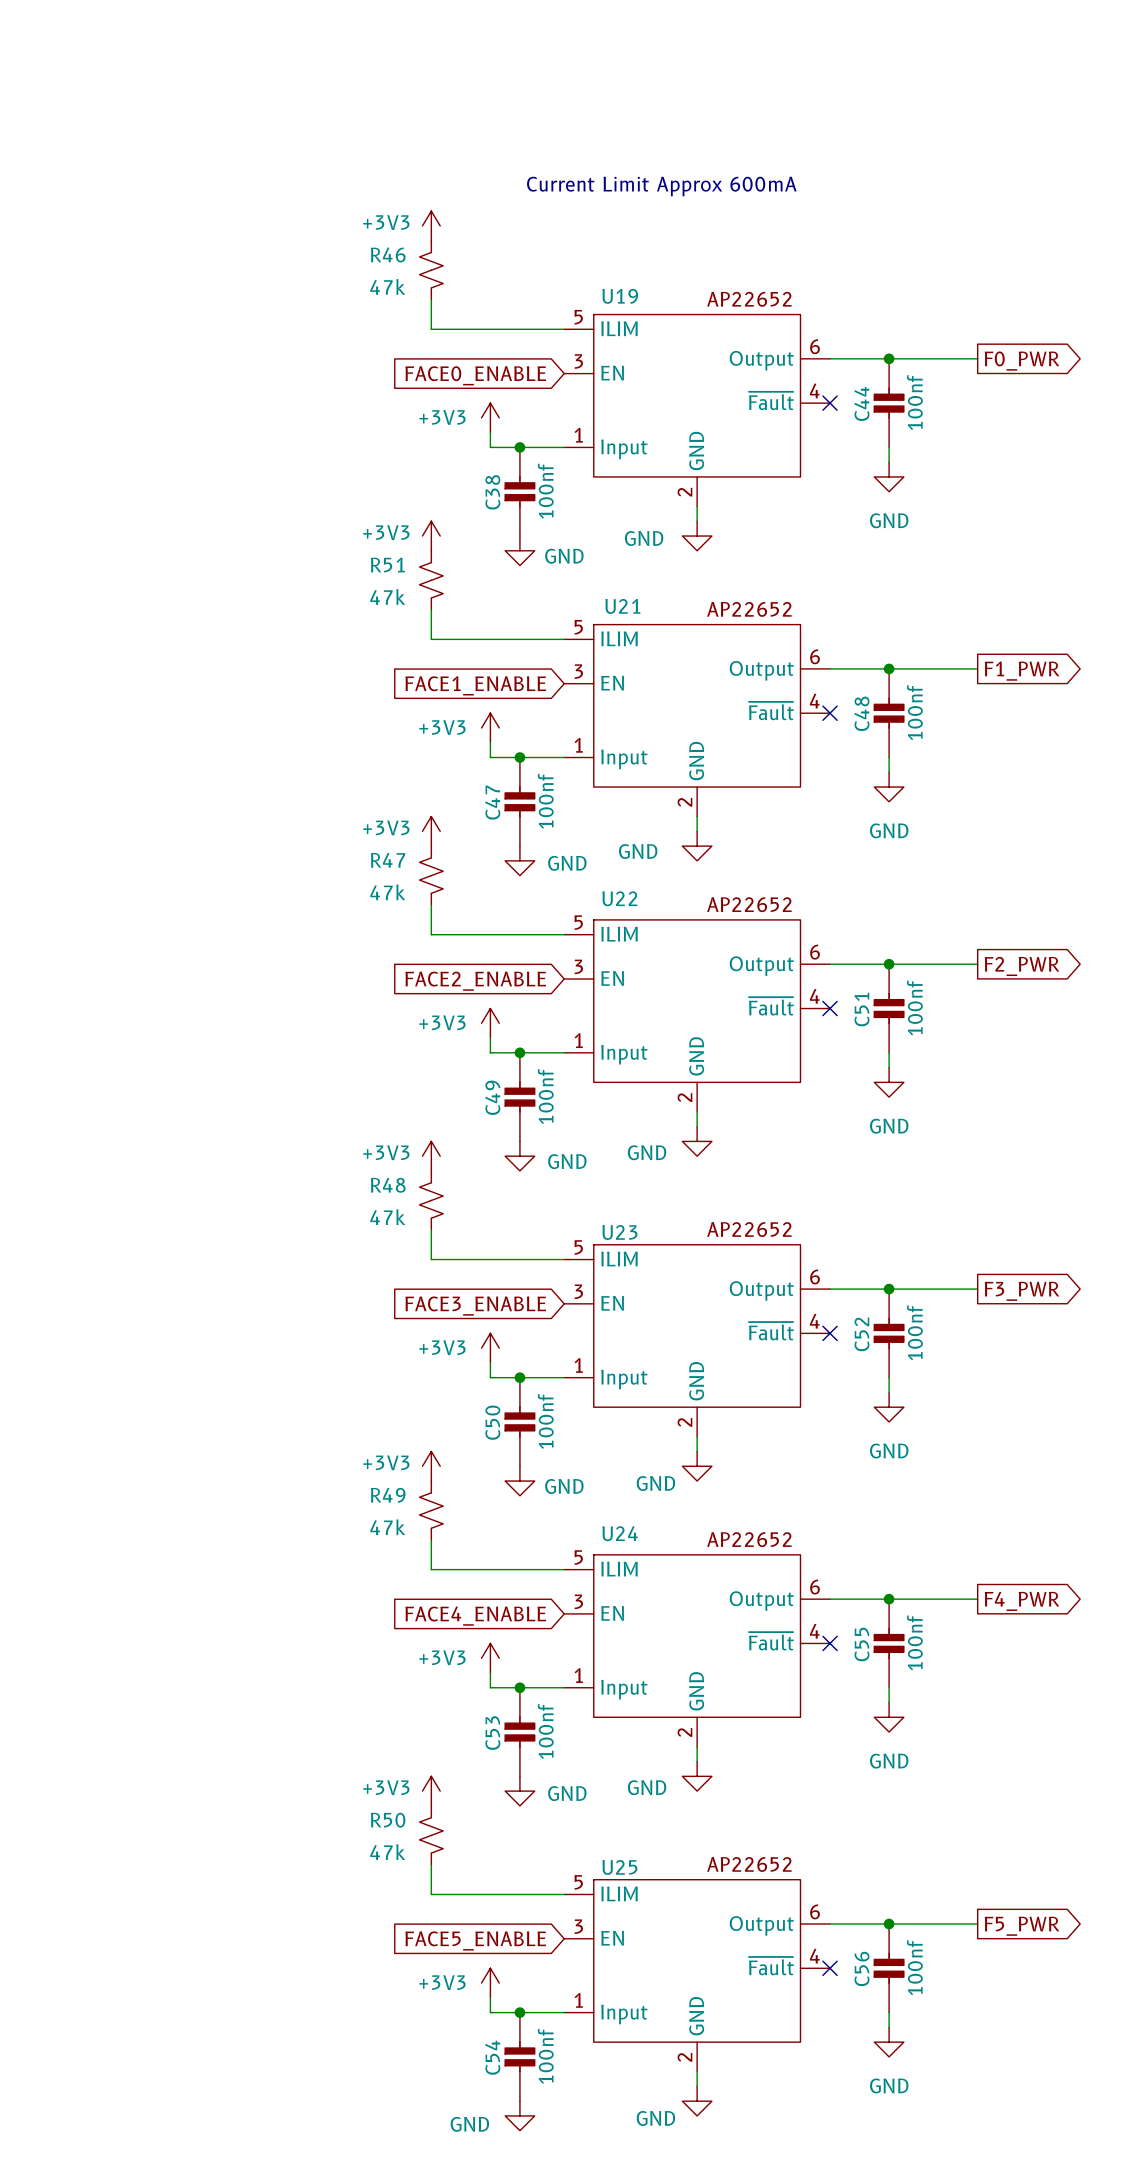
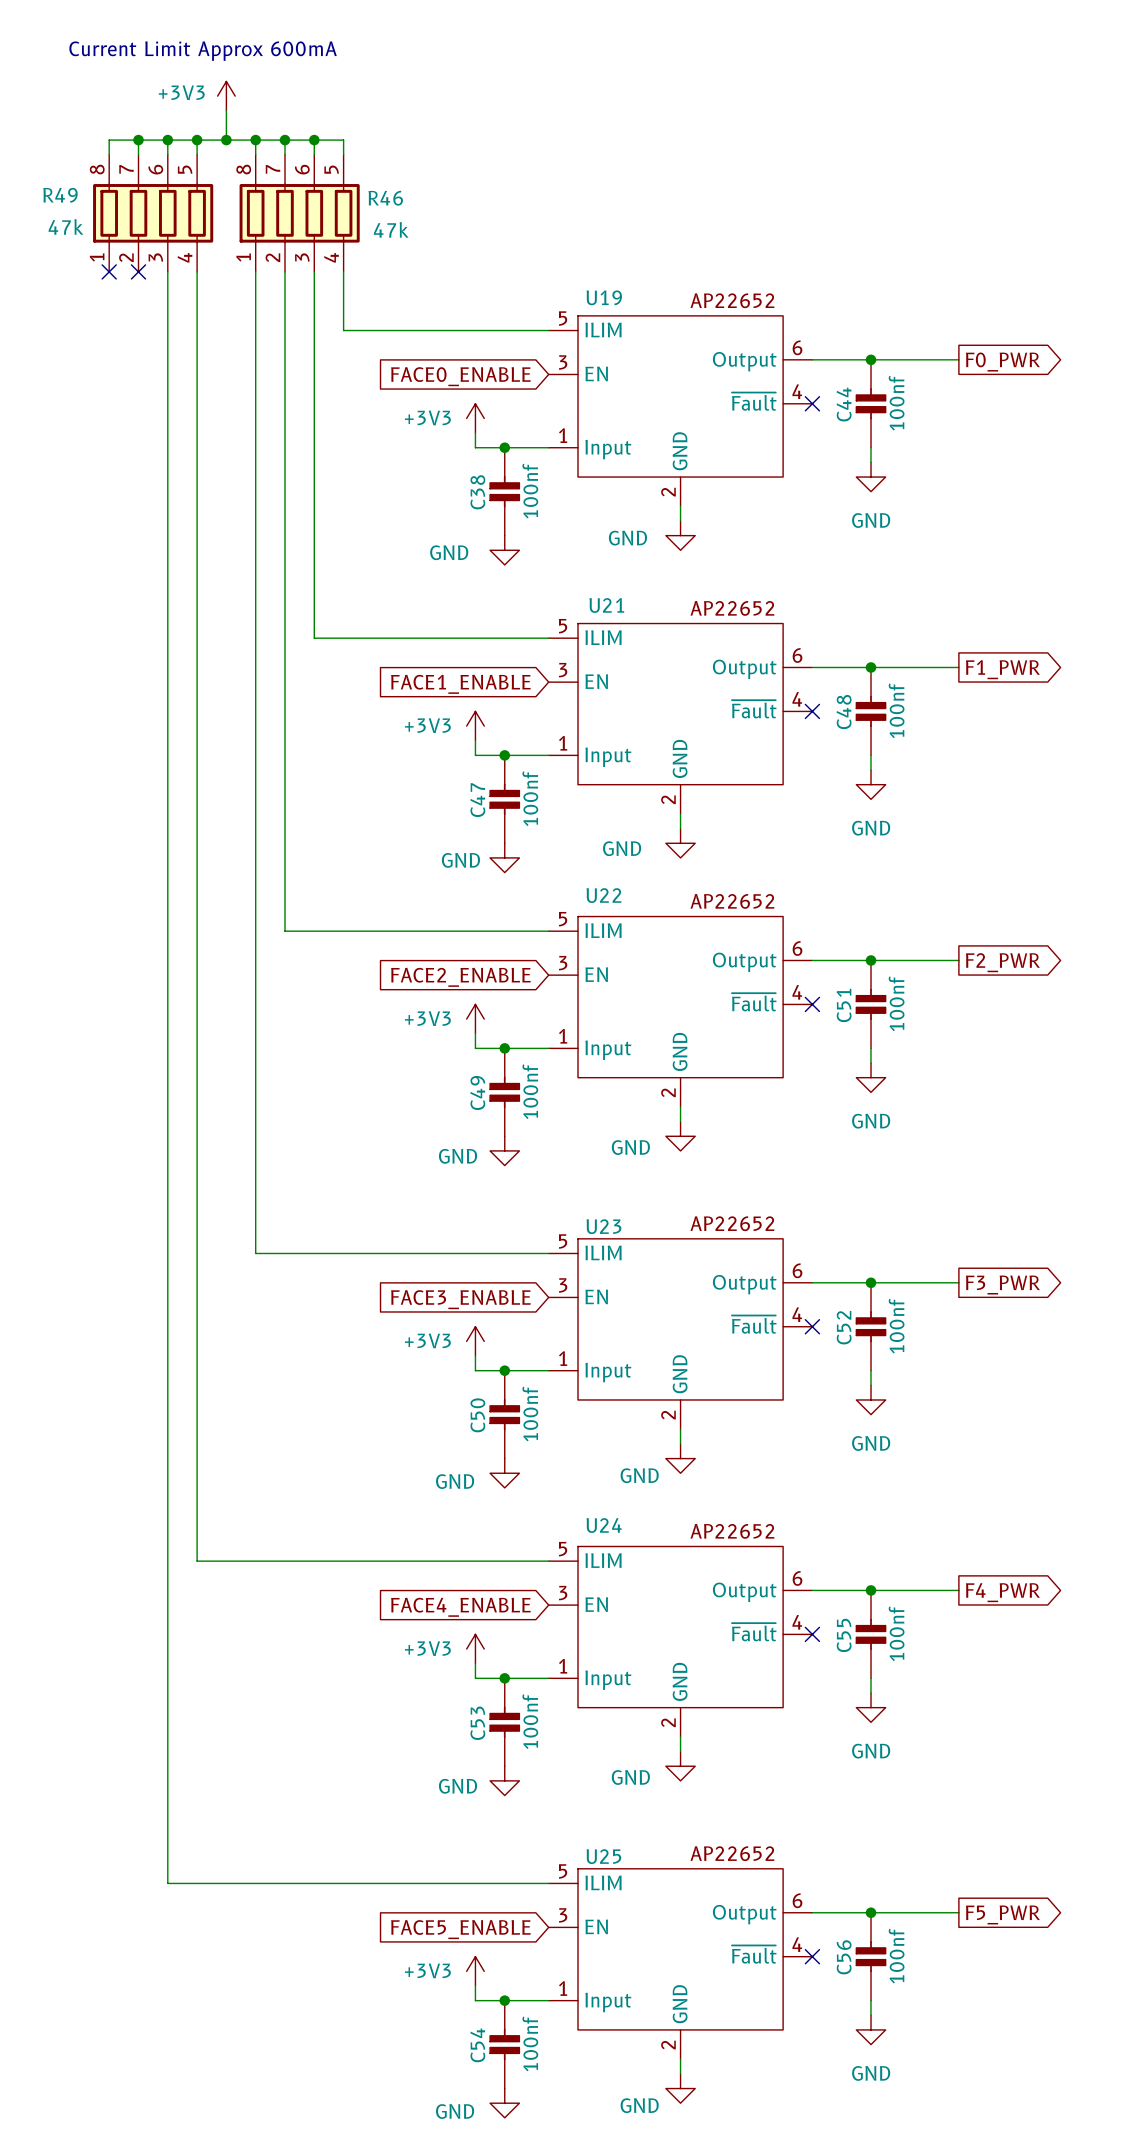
text: none -> Current Limit Approx 600mA (203, 51)
wire: none -> (226, 110) (226, 140)
wire: none -> (138, 140) (138, 154)
junction: none -> (138, 140)
wire: none -> (167, 140) (167, 154)
junction: none -> (167, 140)
wire: none -> (197, 140) (197, 154)
junction: none -> (197, 140)
junction: none -> (226, 140)
wire: none -> (255, 140) (255, 154)
junction: none -> (255, 140)
wire: none -> (284, 140) (284, 154)
junction: none -> (284, 140)
wire: none -> (314, 140) (314, 154)
junction: none -> (314, 140)
wire: none -> (109, 154) (109, 140) (343, 140) (343, 154)
text: Current Limit Approx 600mA (661, 186) -> none
power symbol position: +3V3 (431, 225) -> +3V3 (226, 96)
R46 symbol: [419, 240, 444, 300] -> [239, 154, 360, 272]
R46 name position: R46 (388, 255) -> R46 (385, 198)
no-connect mark: none -> (109, 271)
no-connect mark: none -> (138, 271)
R46 value position: 47k (387, 286) -> 47k (391, 229)
wire: (431, 299) (431, 329) -> (343, 271) (343, 330) (416, 330)
power symbol: +3V3 (431, 536) -> none
power symbol text position: GND (564, 556) -> GND (449, 552)
R51: 47k (431, 580) -> none
wire: (431, 609) (431, 639) -> (314, 271) (314, 638) (416, 638)
power symbol: +3V3 (431, 831) -> none
power symbol text position: GND (567, 863) -> GND (460, 860)
R47: 47k (431, 875) -> none
wire: (431, 905) (431, 934) -> (284, 271) (284, 931) (416, 931)
power symbol: +3V3 (431, 1156) -> none
power symbol text position: GND (567, 1161) -> GND (458, 1156)
R48: 47k (431, 1200) -> none
wire: (431, 1230) (431, 1259) -> (255, 271) (255, 1253) (416, 1253)
power symbol: +3V3 (431, 1466) -> none
R49 symbol: [419, 1481, 444, 1541] -> [93, 154, 214, 272]
power symbol text position: GND (564, 1486) -> GND (455, 1481)
R49 name position: R49 (388, 1495) -> R49 (60, 195)
R49 value position: 47k (387, 1527) -> 47k (65, 226)
wire: (431, 1540) (431, 1569) -> (197, 271) (197, 1561) (416, 1561)
power symbol: +3V3 (431, 1791) -> none
power symbol text position: GND (567, 1793) -> GND (458, 1786)
R50: 47k (431, 1835) -> none
wire: (431, 1864) (431, 1894) -> (167, 271) (167, 1883) (416, 1883)

